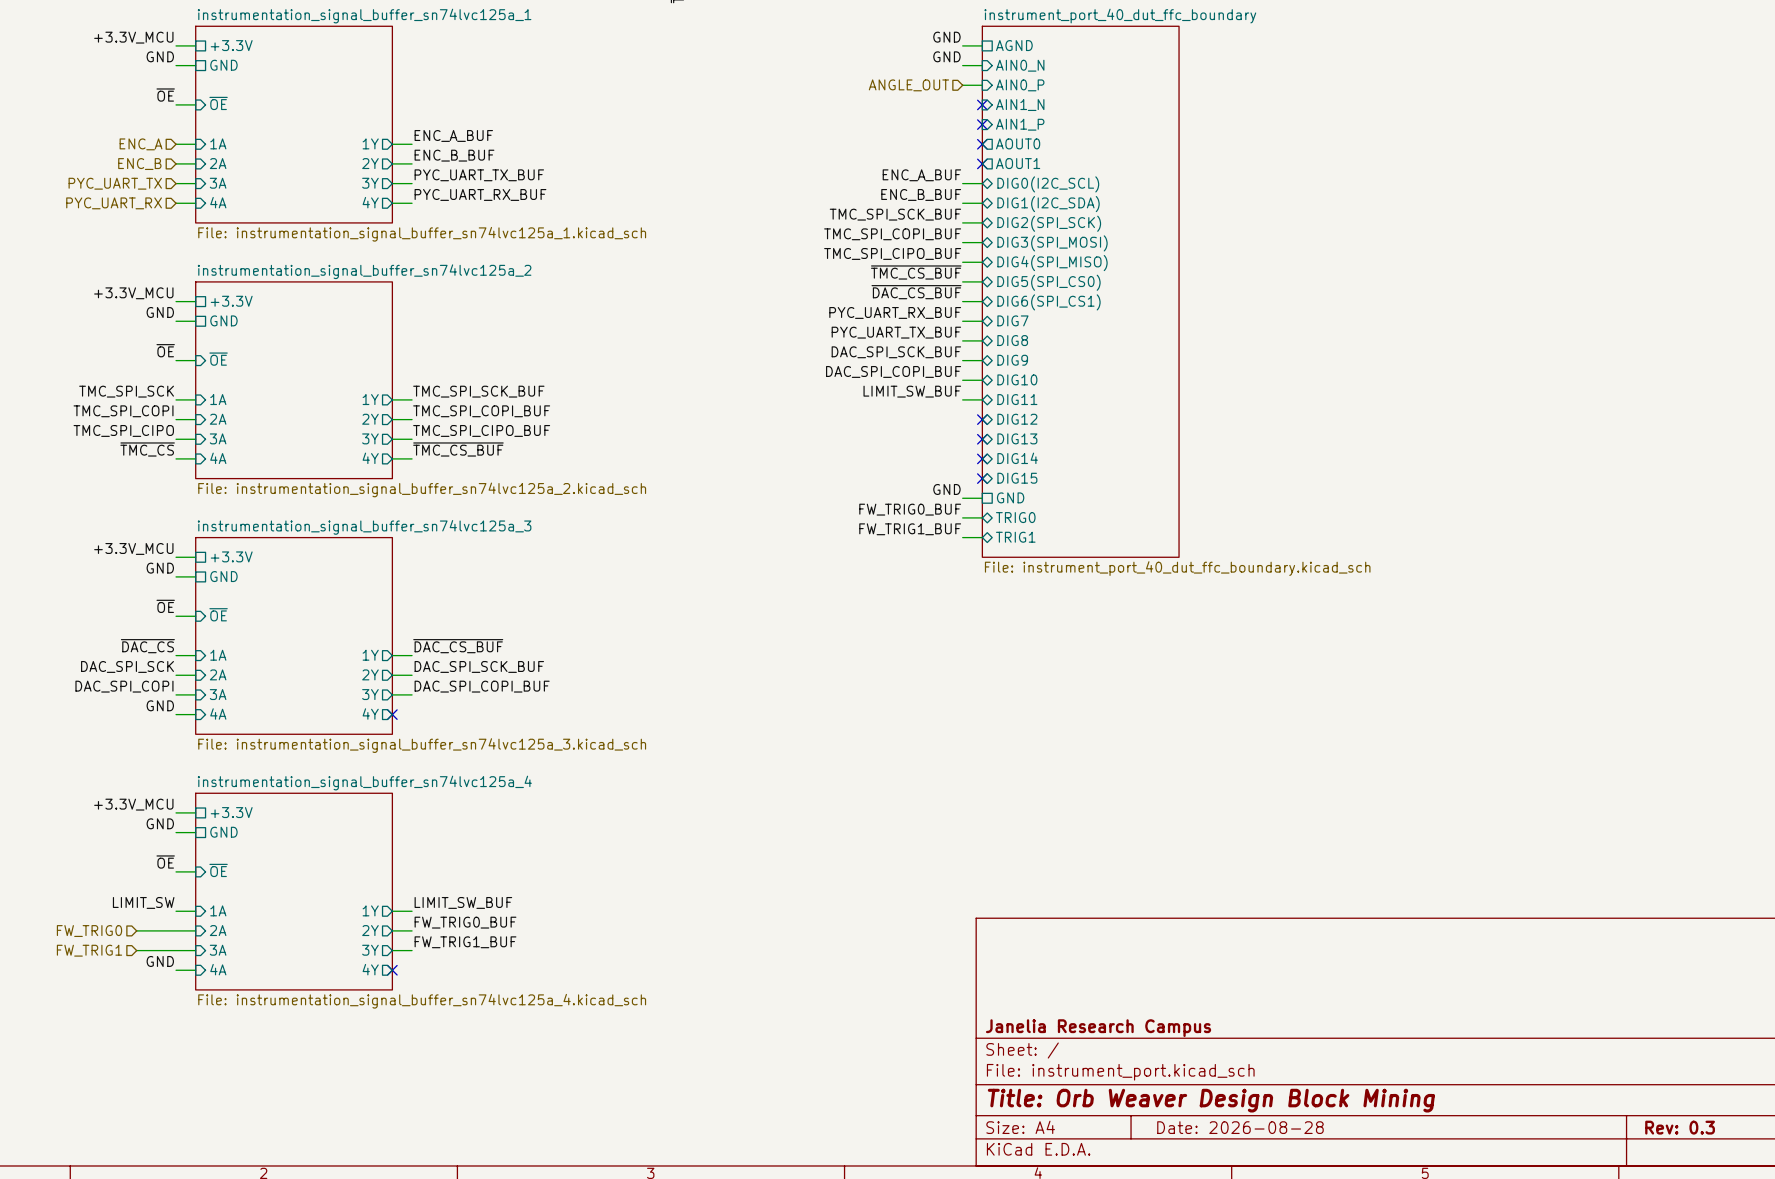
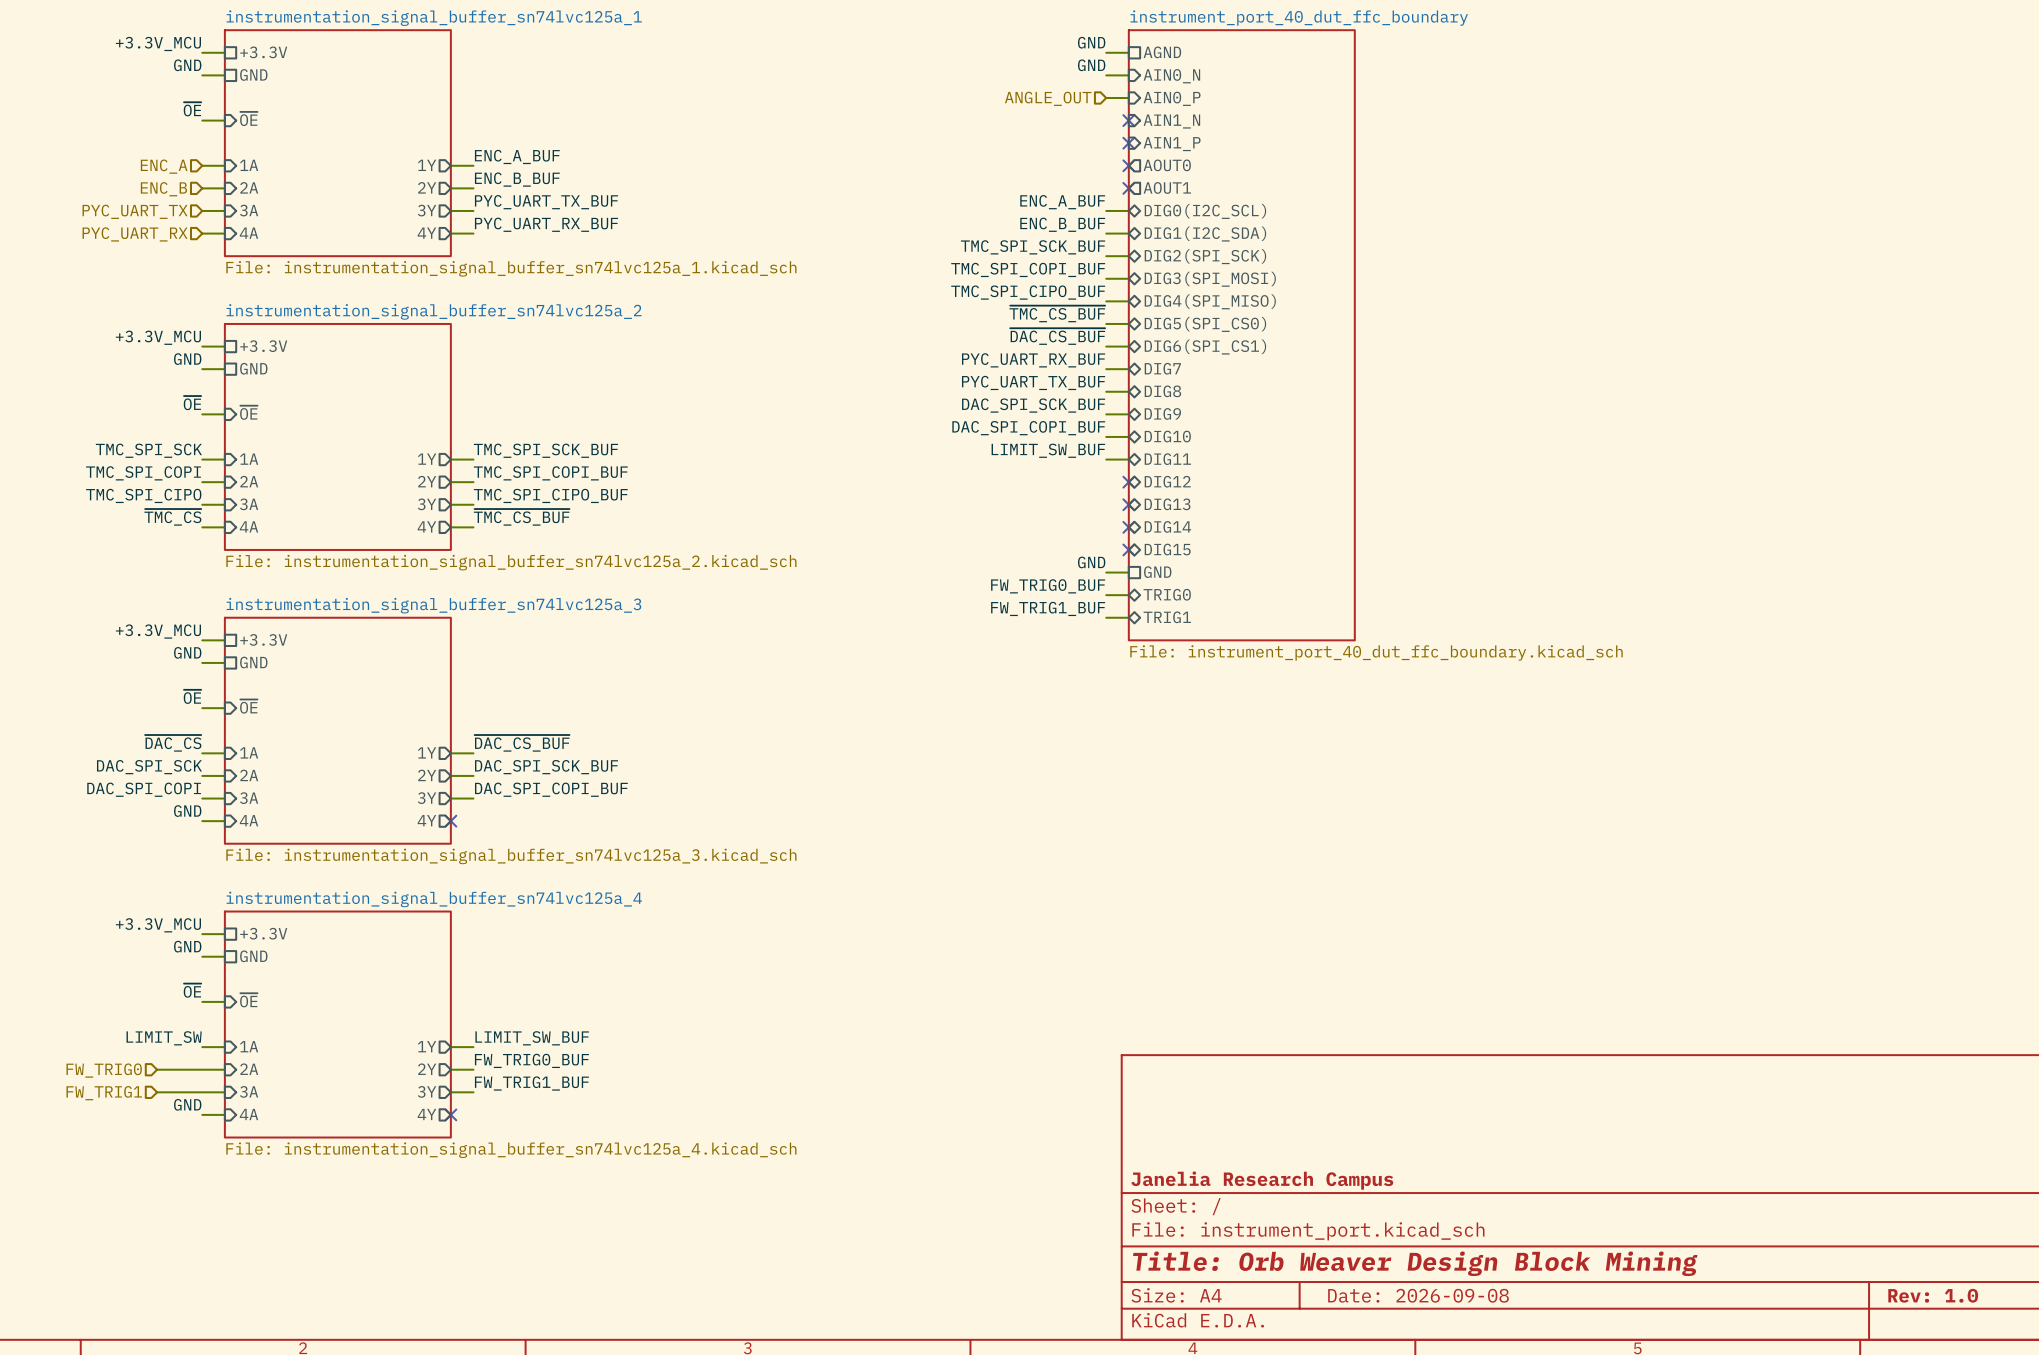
title block: Date: 2026-08-28 (1240, 1127) -> Date: 2026-09-08 (1418, 1295)
title block: Rev: 0.3 (1680, 1127) -> Rev: 1.0 (1933, 1295)

